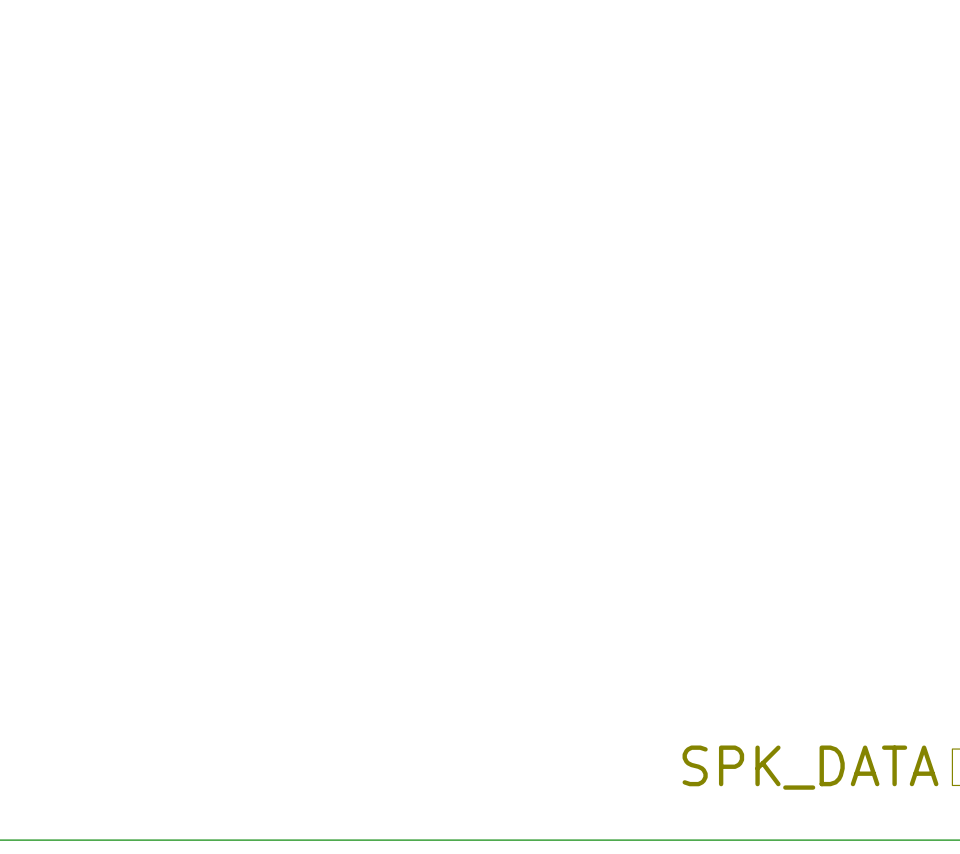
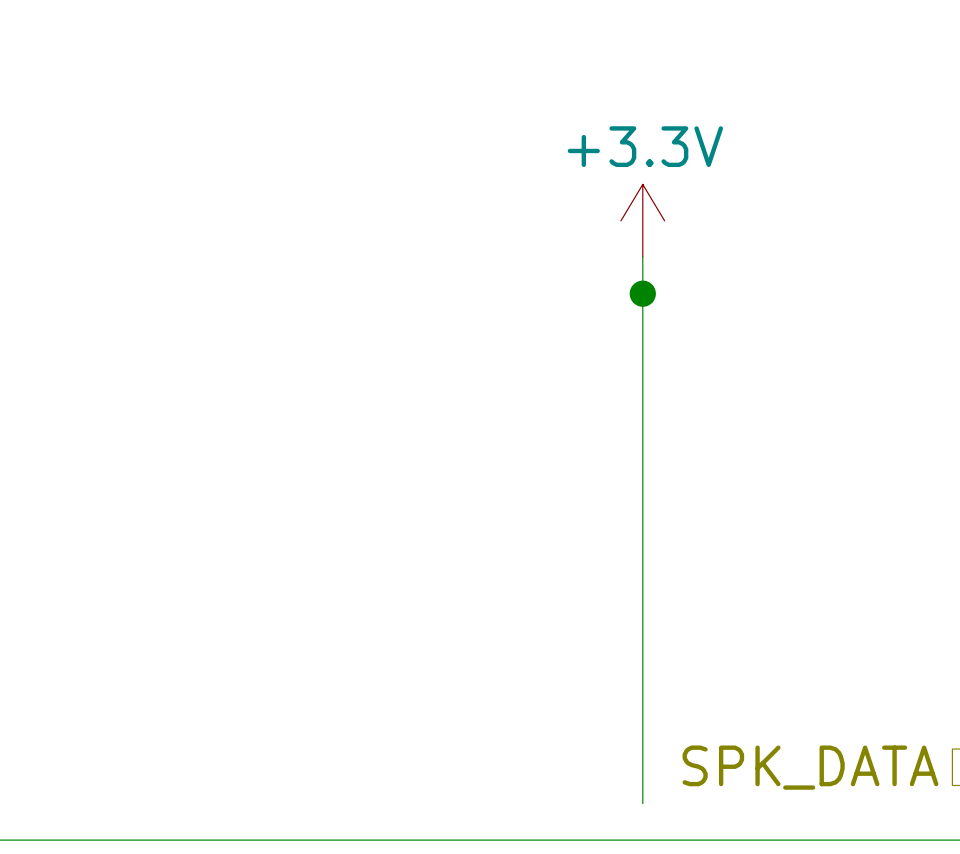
power symbol: none -> +3.3V (642, 220)
wire: none -> (642, 257) (642, 803)
junction: none -> (642, 293)

